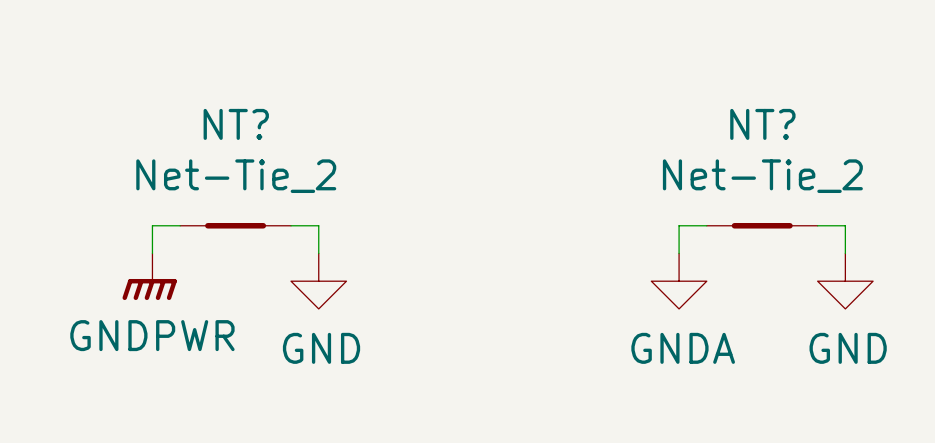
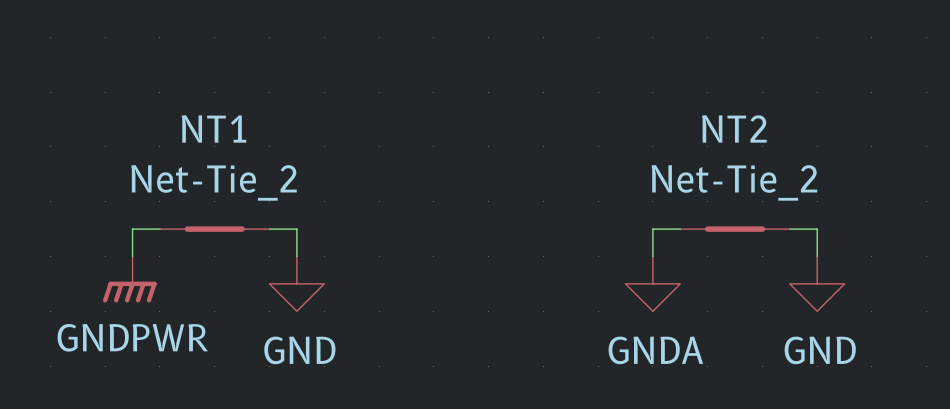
NT? name: NT? (236, 124) -> NT1 (213, 128)
NT? name: NT? (762, 124) -> NT2 (734, 128)

